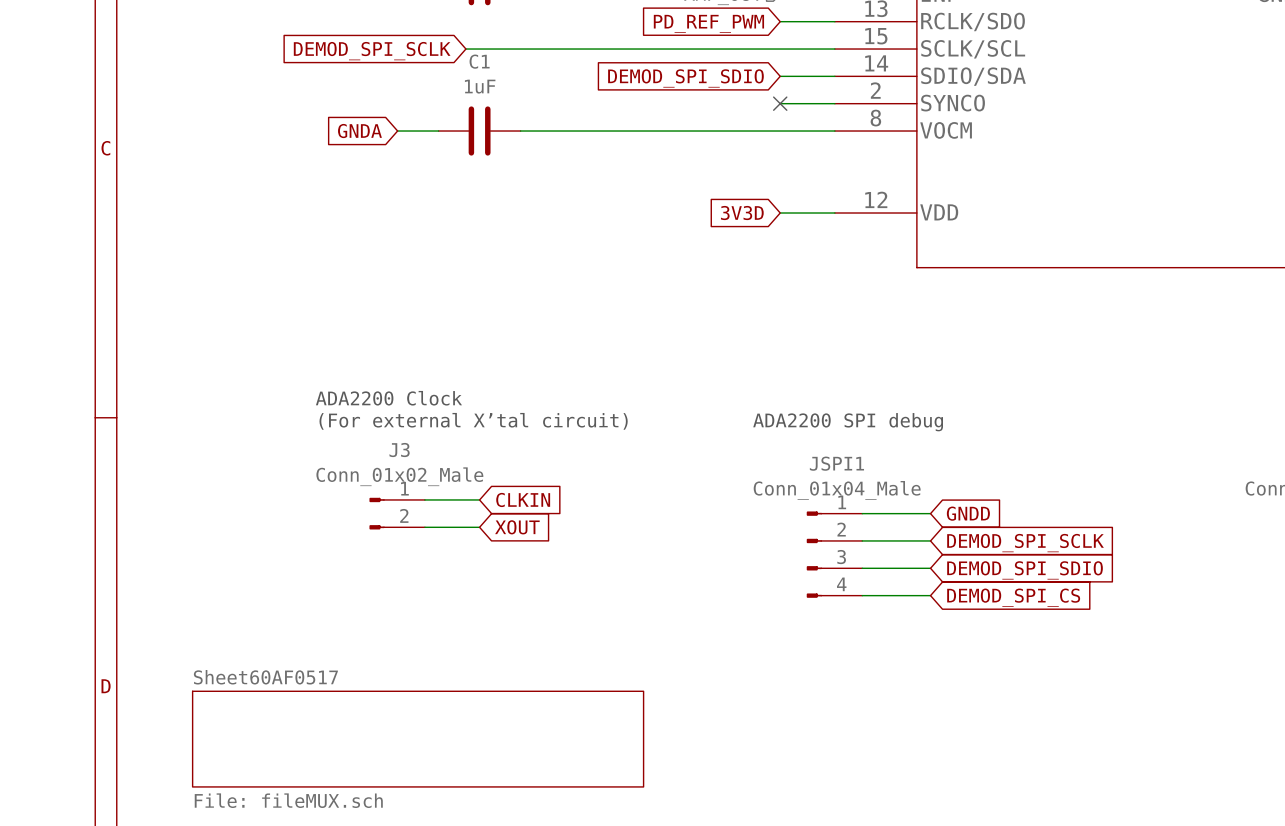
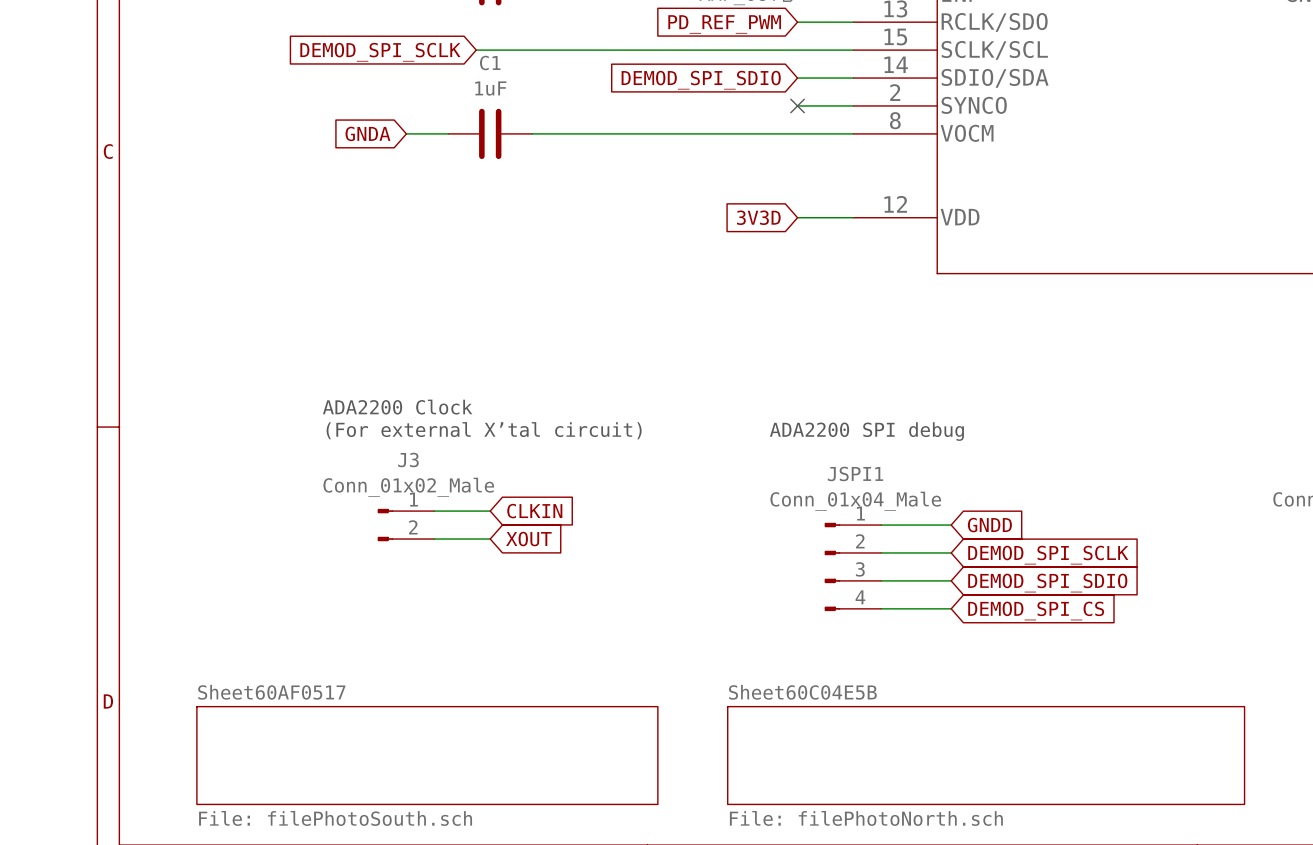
sheet Sheet60C04E5B: none -> File: filePhotoNorth.sch (986, 755)
sheet Sheet60AF0517 value: File: fileMUX.sch (288, 800) -> File: filePhotoSouth.sch (335, 818)

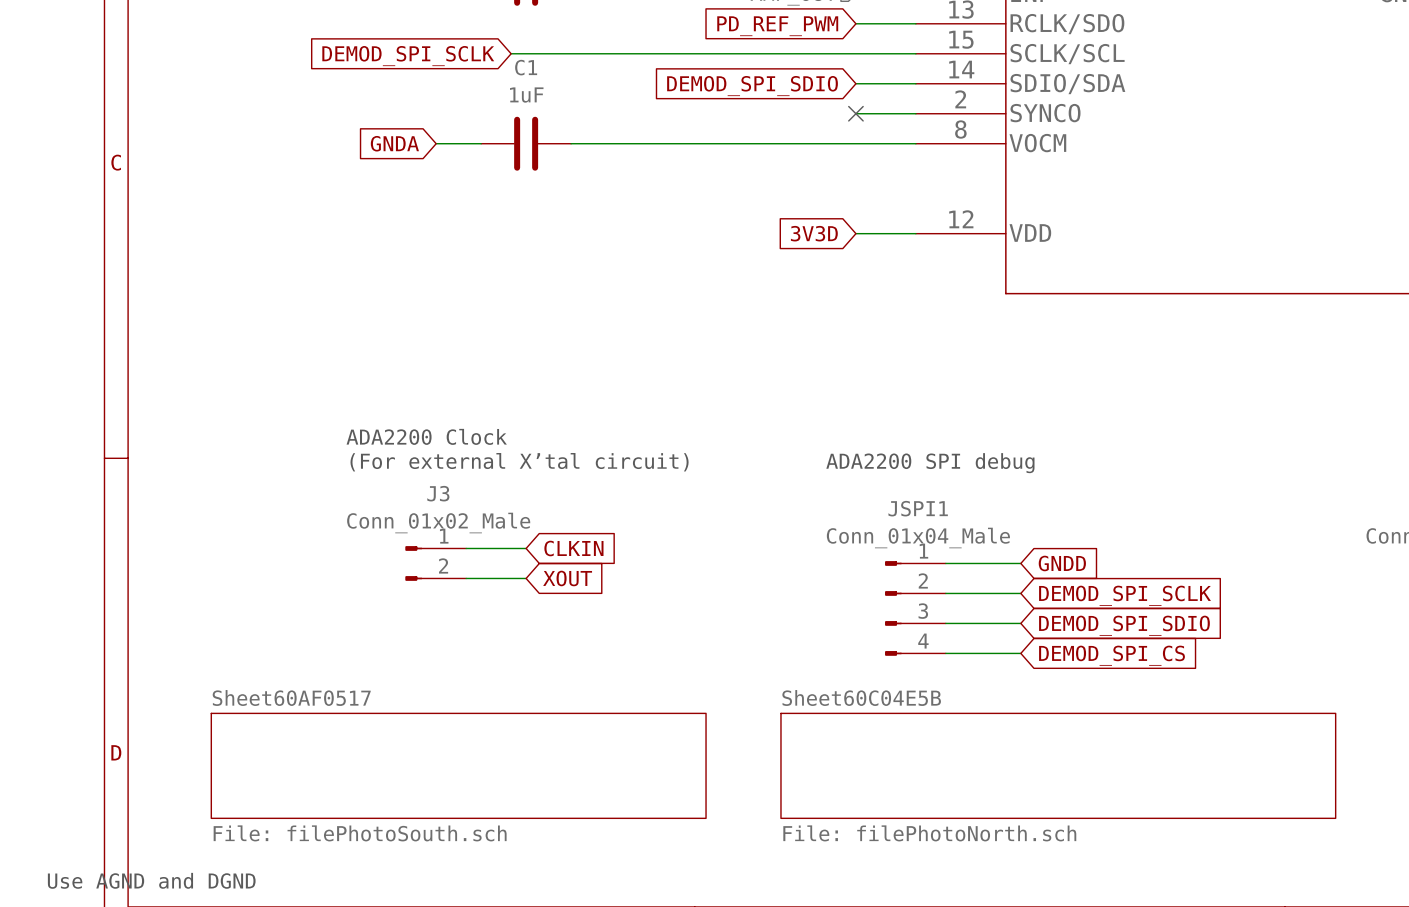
sheet Sheet60AF0517 position: (427, 755) -> (458, 765)
sheet Sheet60C04E5B position: (986, 755) -> (1058, 765)
text: none -> Use AGND and DGND (151, 880)

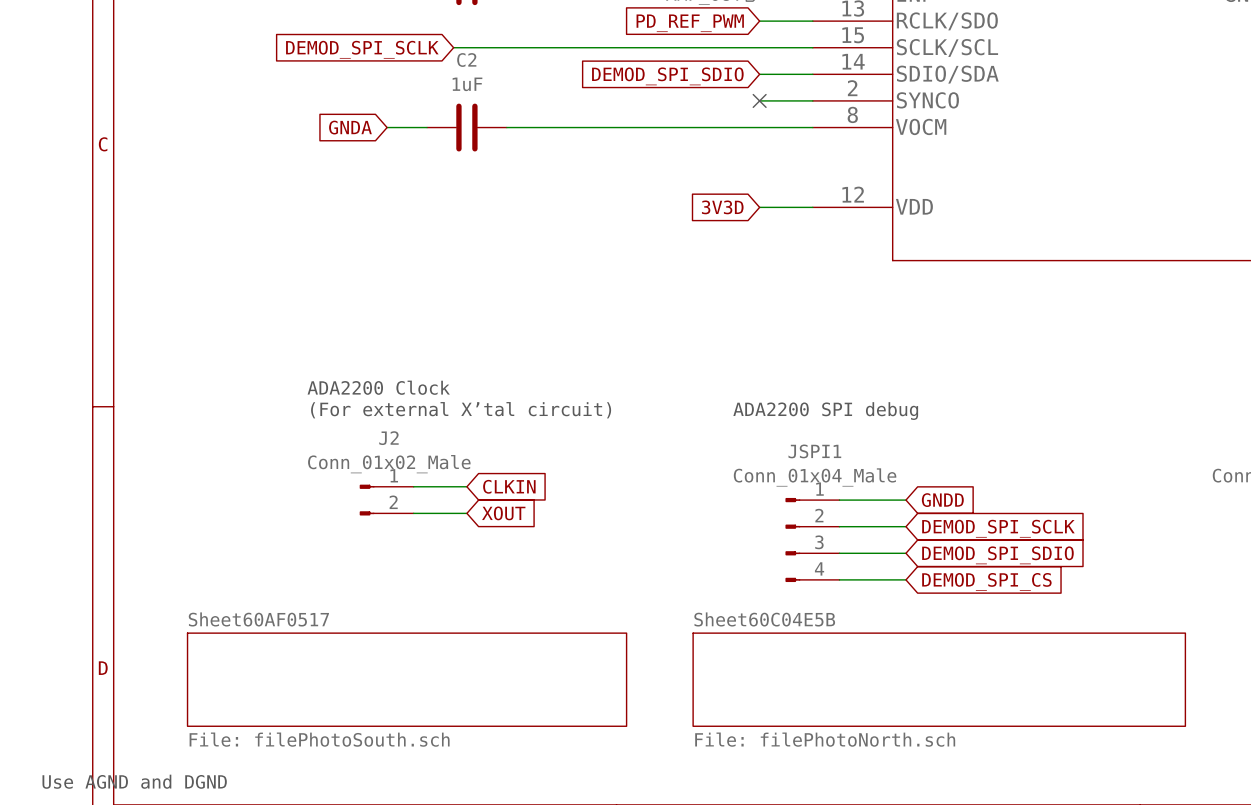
C1 name: C1 (526, 67) -> C2 (466, 60)
J3 name: J3 (438, 493) -> J2 (388, 438)

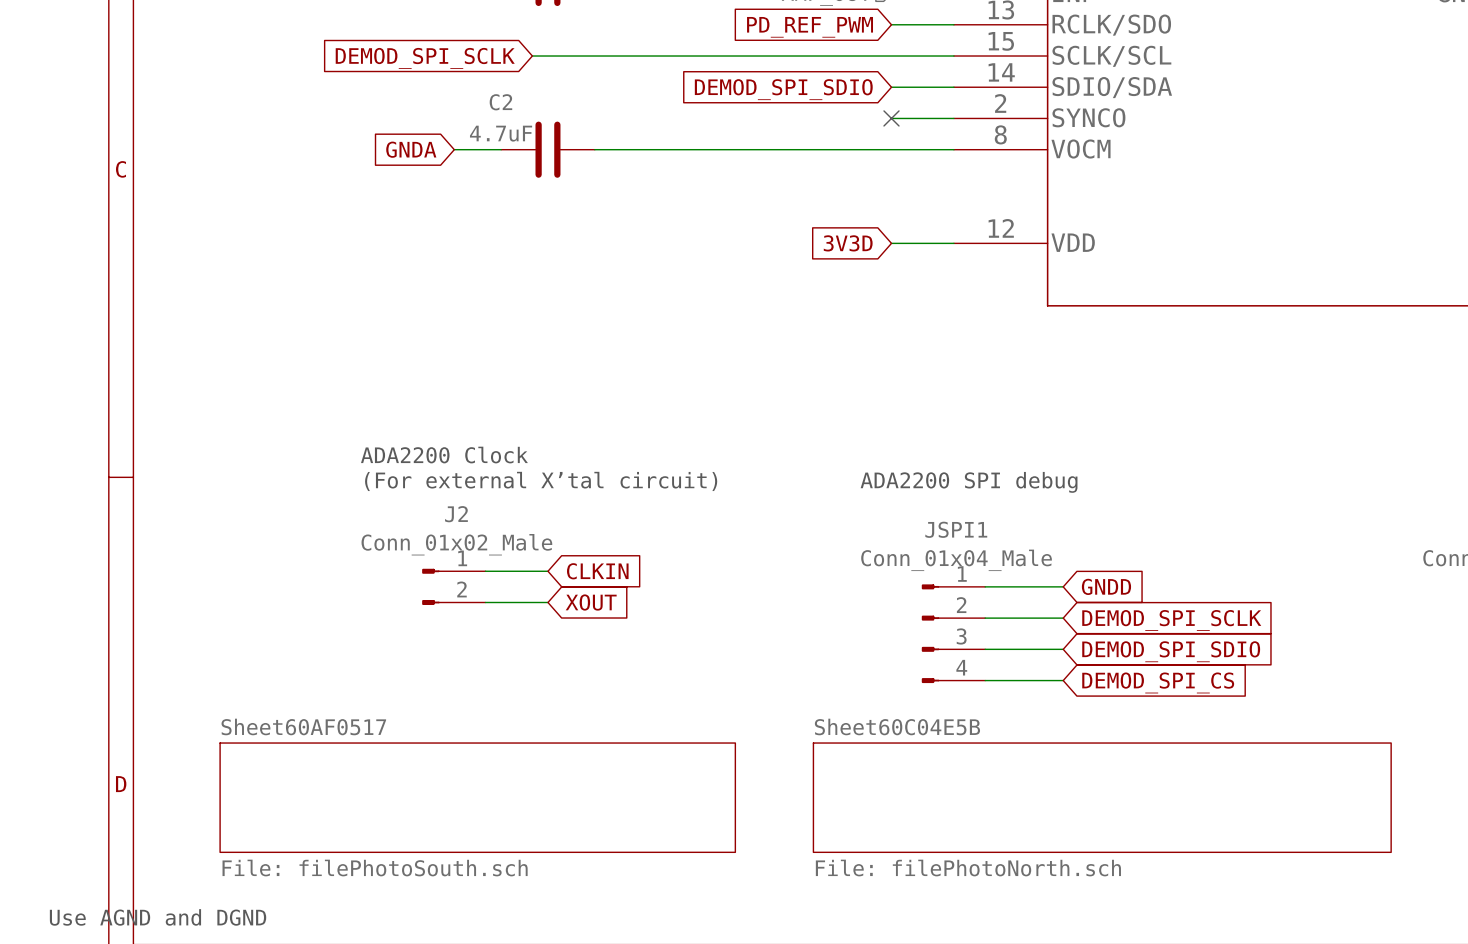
C2 name position: C2 (466, 60) -> C2 (500, 102)
C2 value: 1uF (467, 84) -> 4.7uF (501, 133)

